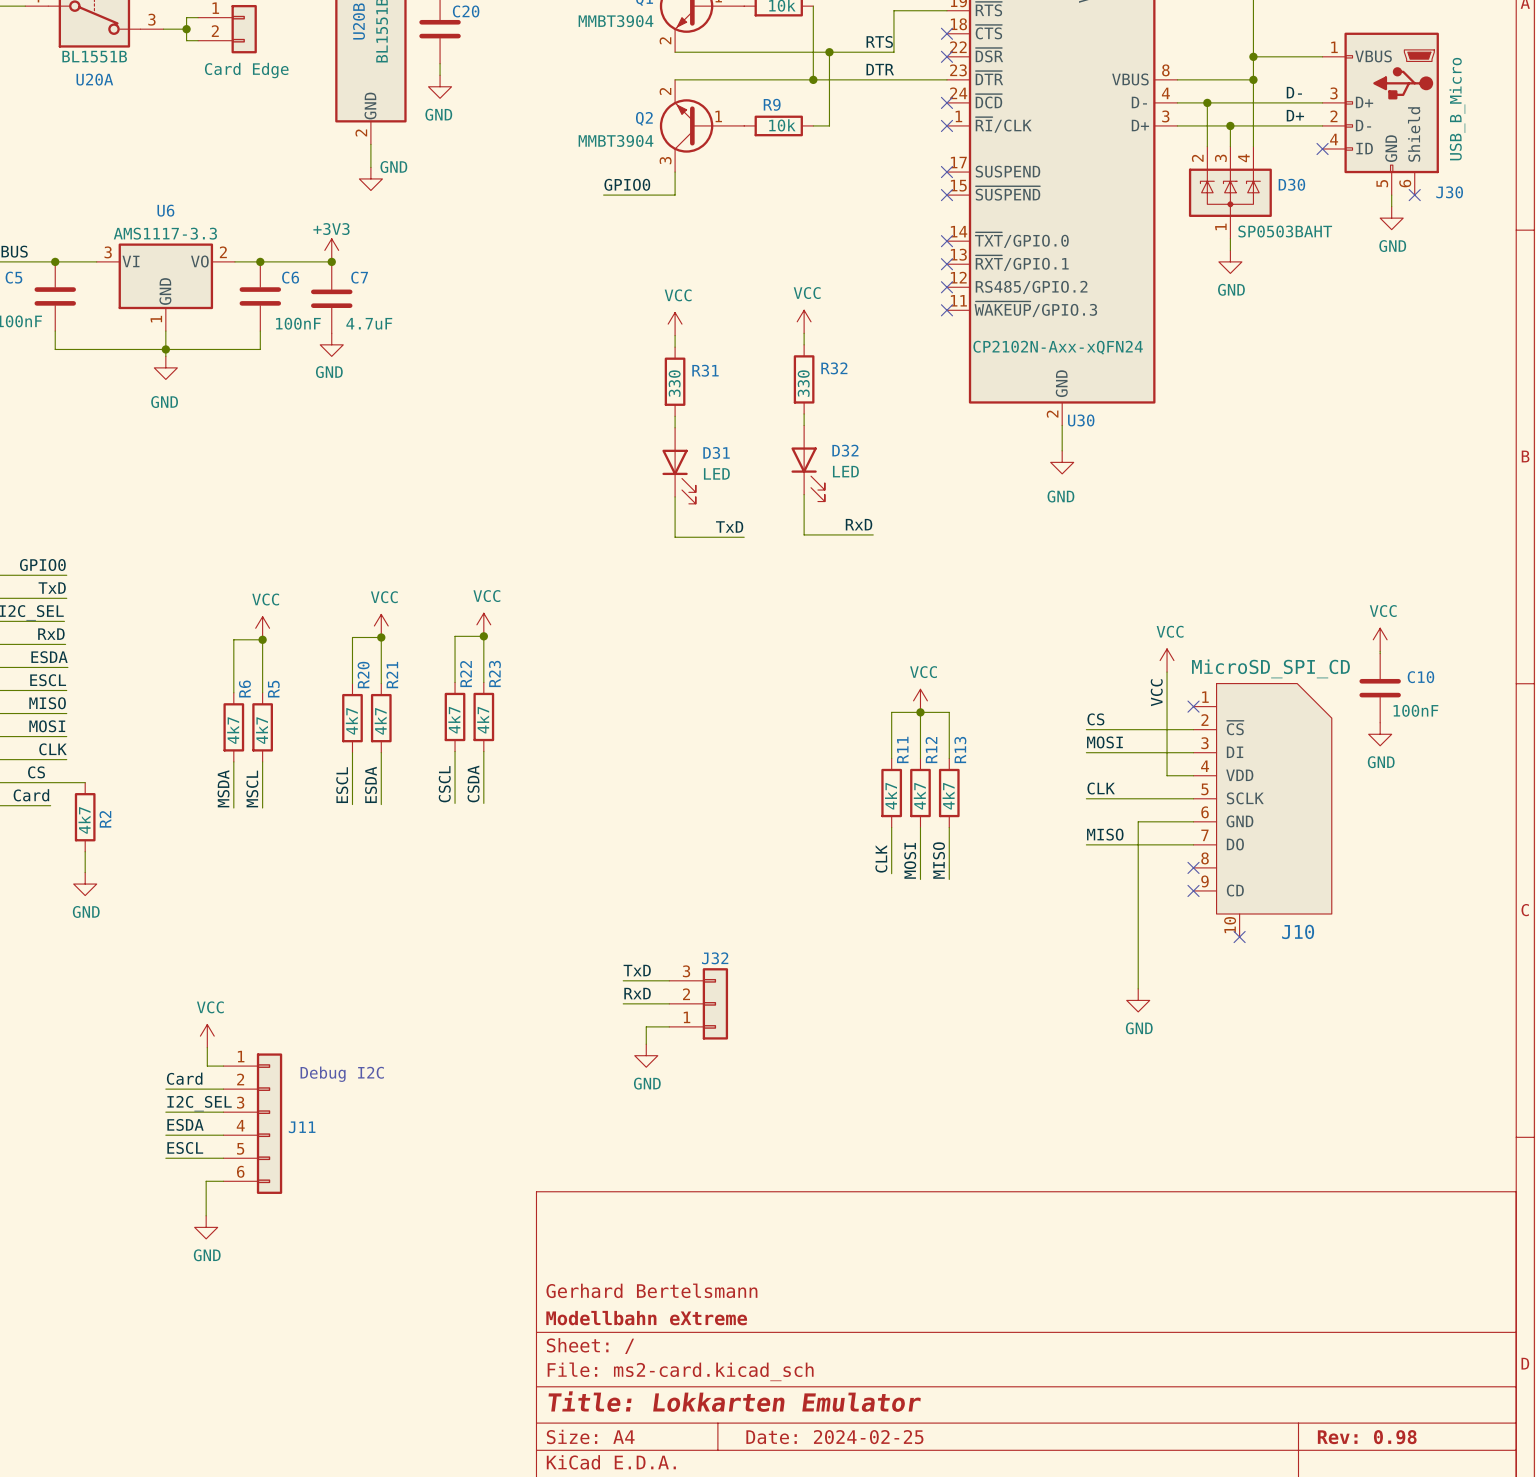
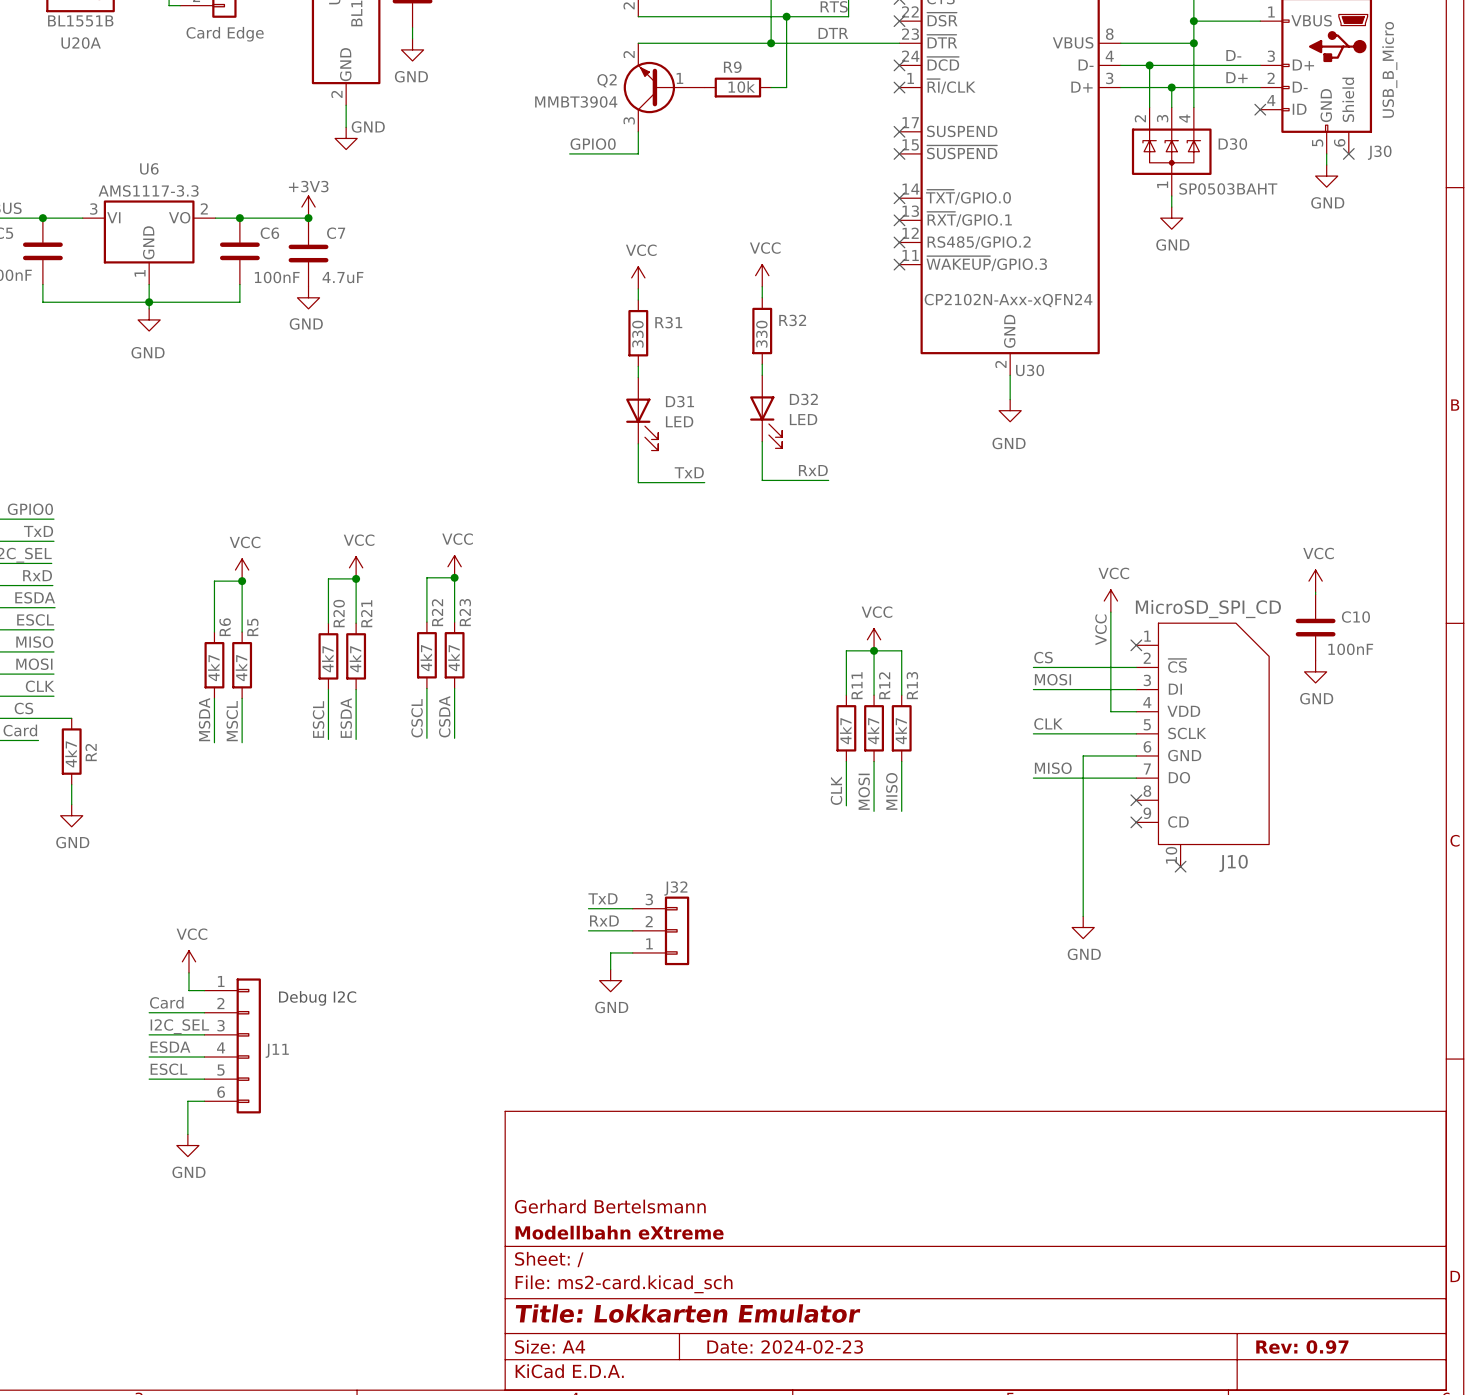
title block: Date: 2024-02-25 (834, 1437) -> Date: 2024-02-23 (785, 1347)
title block: Rev: 0.98 (1367, 1437) -> Rev: 0.97 (1302, 1347)

